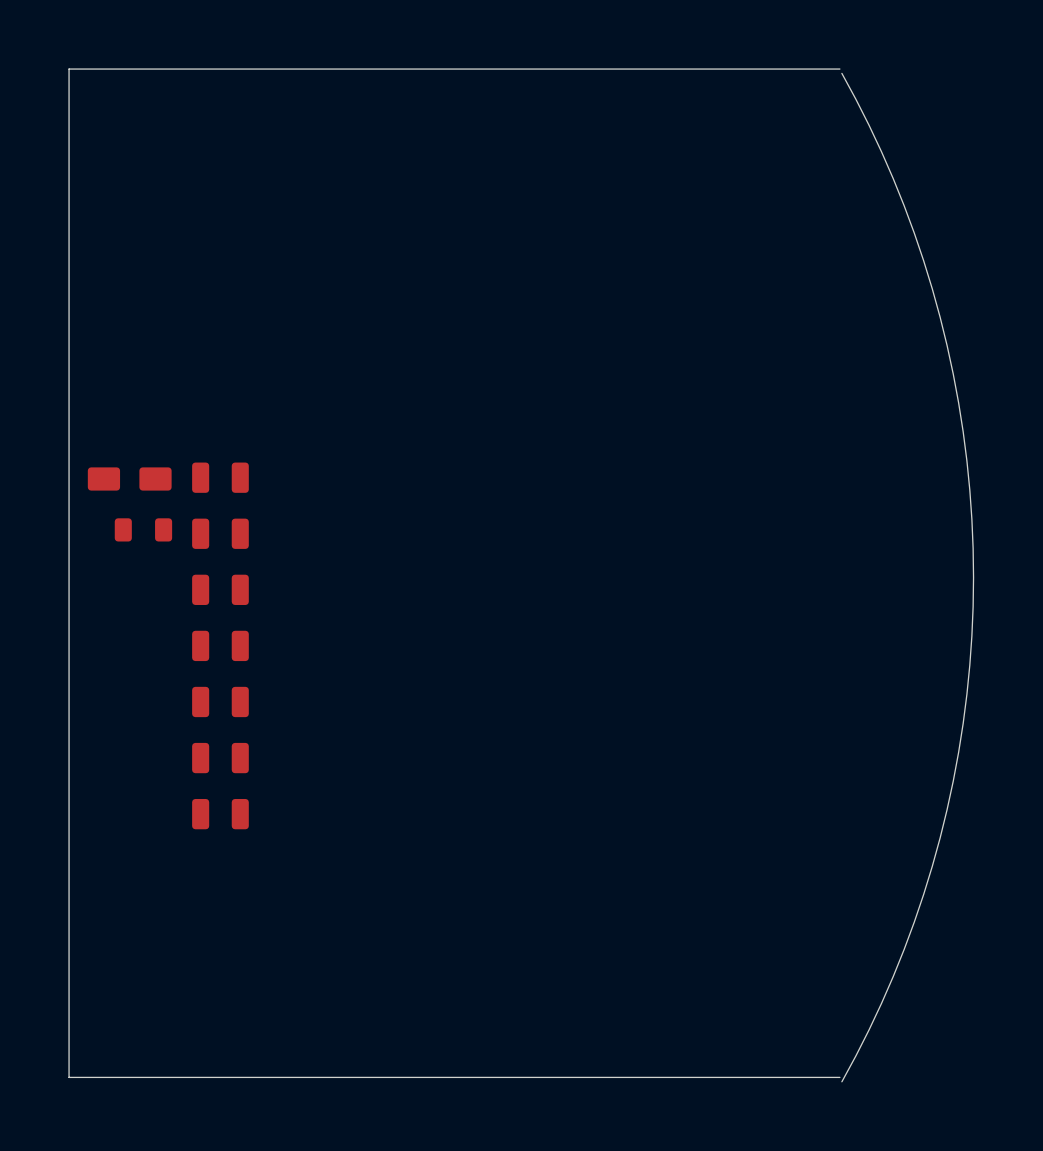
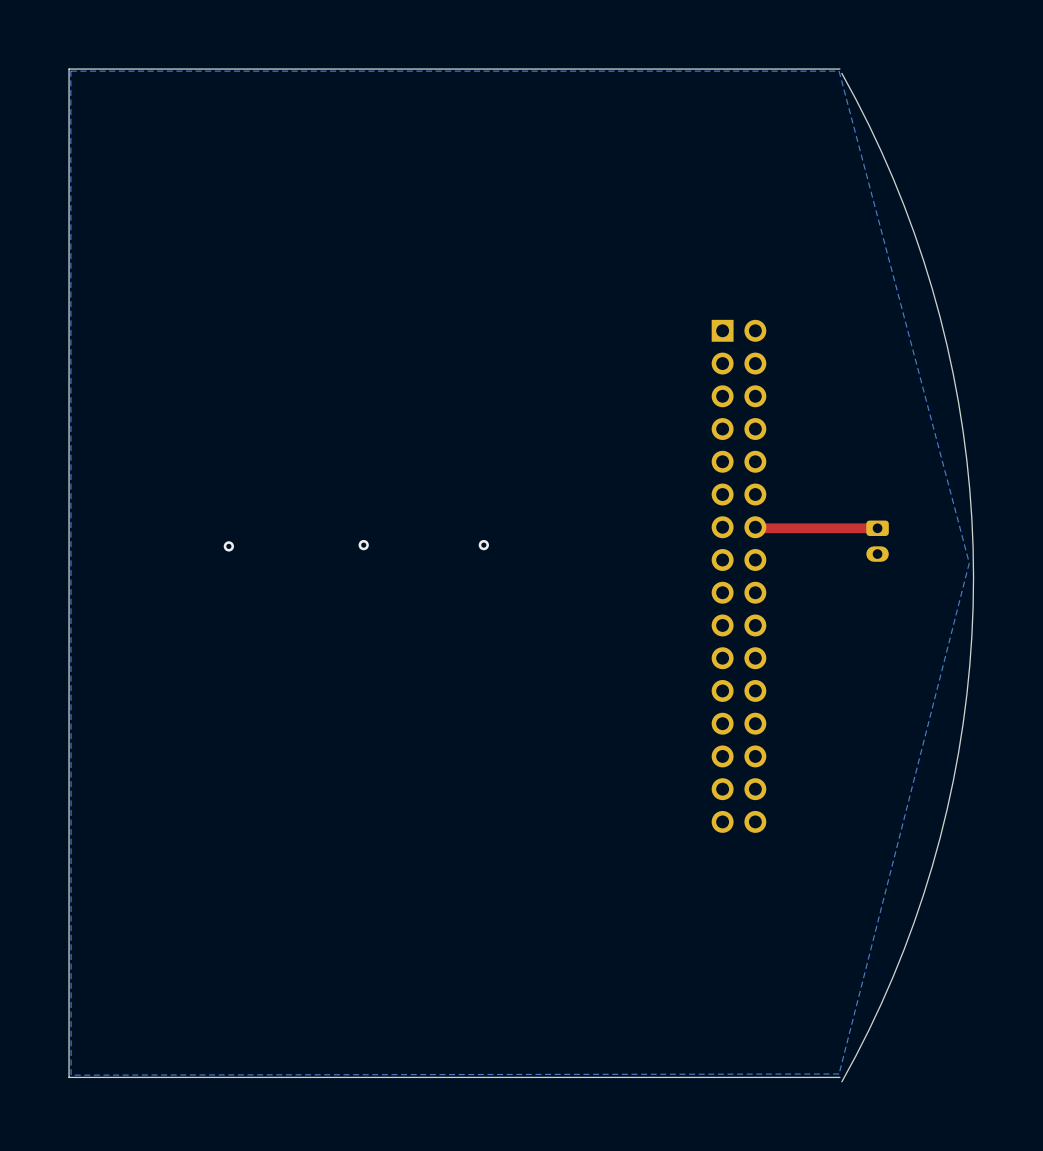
bottom zone outline: none -> (839, 71) (70, 71) (71, 1075) (839, 1073) (969, 563) (839, 71)
part: (220, 477) -> none
part: (129, 478) -> none
top track: none -> (755, 527) (877, 528)
part: (143, 529) -> none
part: (220, 533) -> none
part: none -> (877, 541)
via: none -> (363, 545)
via: none -> (483, 545)
via: none -> (228, 546)
part: none -> (738, 576)
part: (220, 589) -> none
part: (220, 645) -> none
part: (220, 701) -> none
part: (220, 758) -> none
part: (220, 814) -> none

